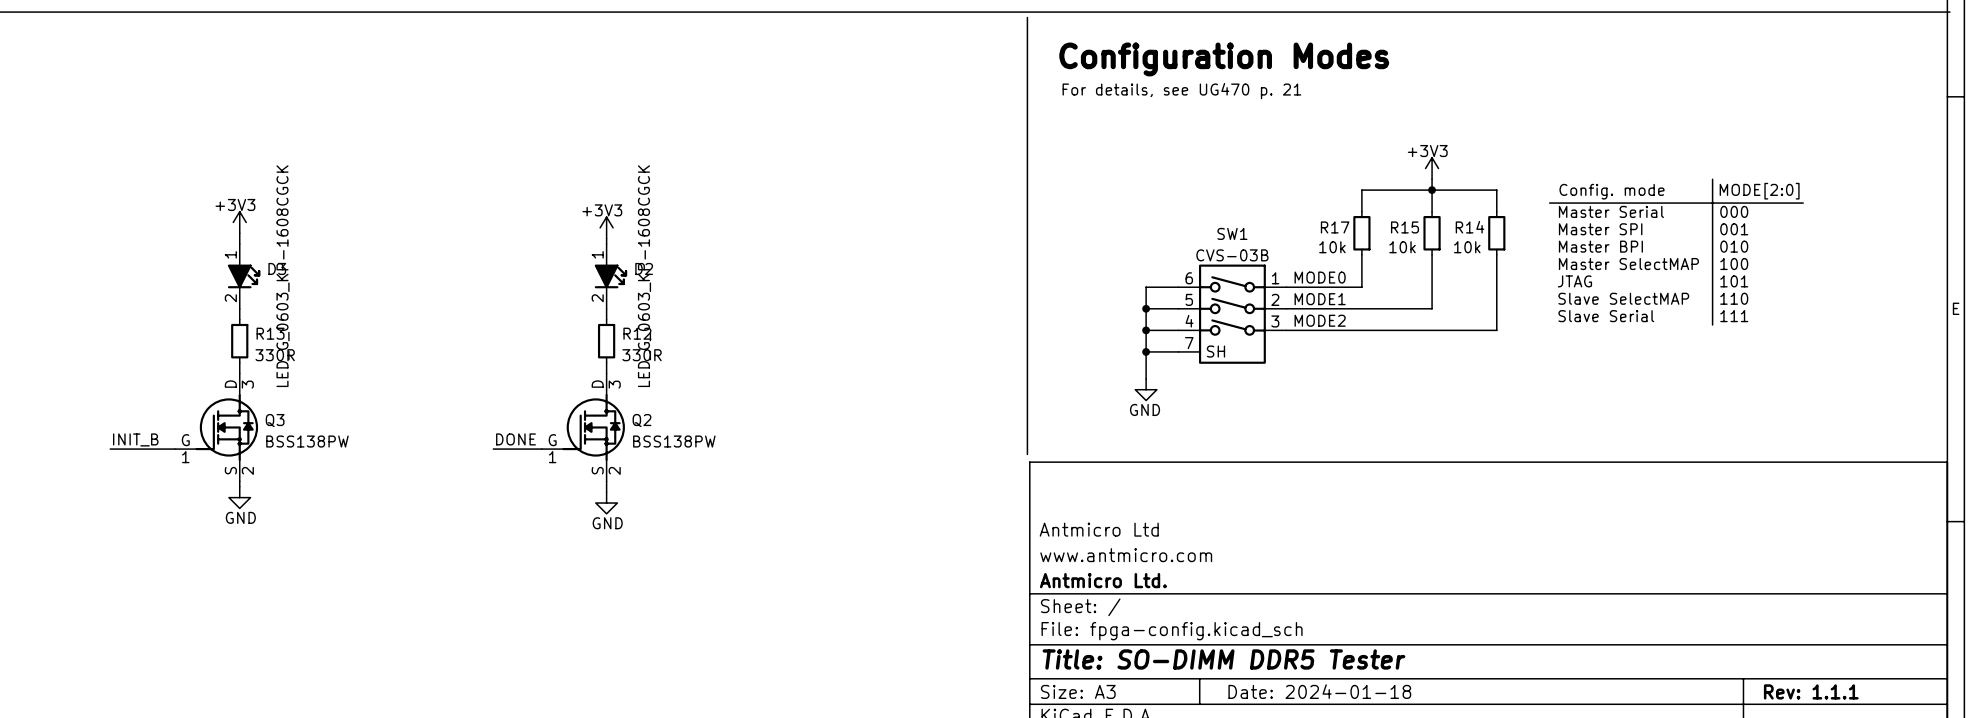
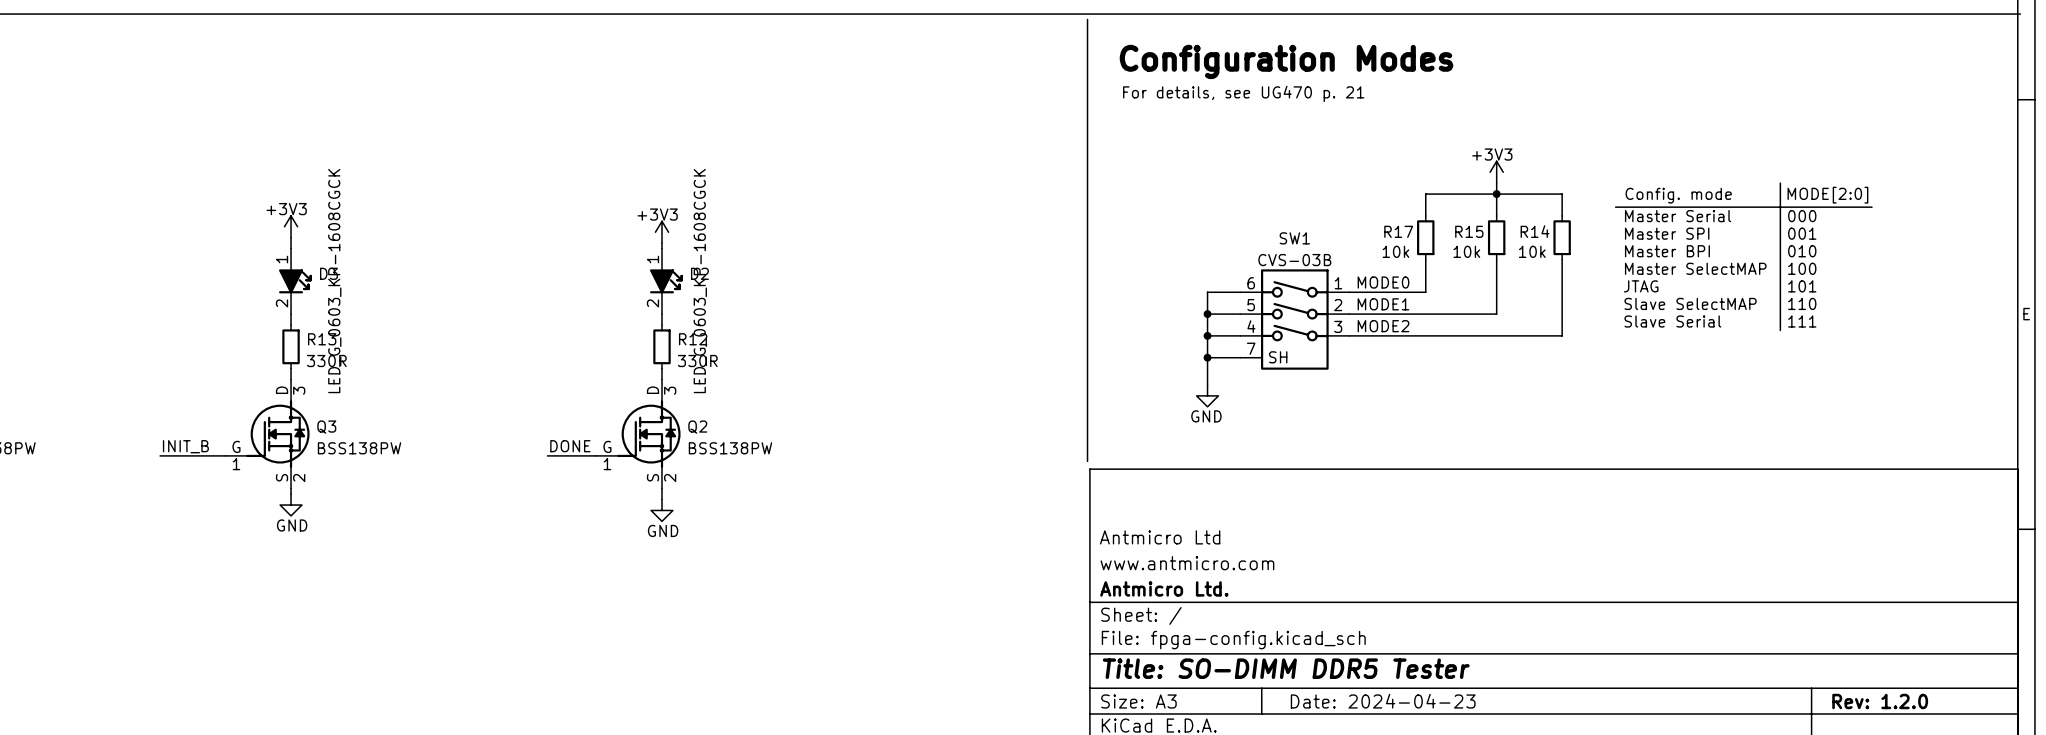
title block: Date: 2024-01-18 (1319, 691) -> Date: 2024-04-23 (1383, 701)
title block: Rev: 1.1.1 (1811, 691) -> Rev: 1.2.0 (1880, 701)

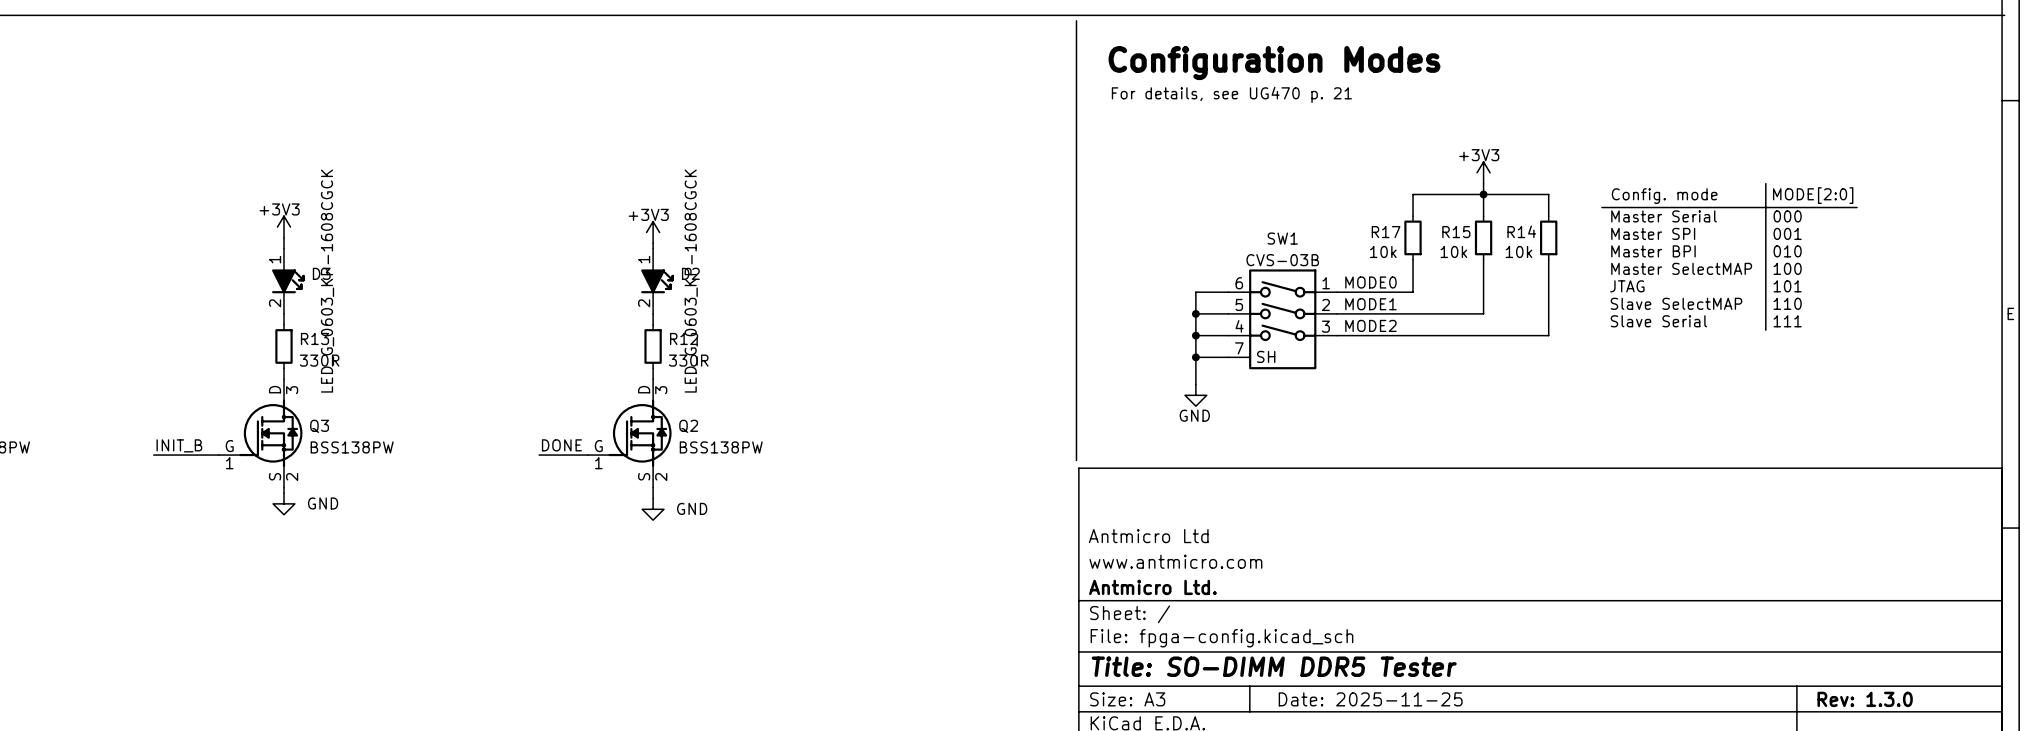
power symbol text position: GND (292, 525) -> GND (323, 503)
power symbol text position: GND (663, 530) -> GND (692, 508)
title block: Date: 2024-04-23 (1383, 701) -> Date: 2025-11-25 (1370, 699)
title block: Rev: 1.2.0 (1880, 701) -> Rev: 1.3.0 (1865, 699)

